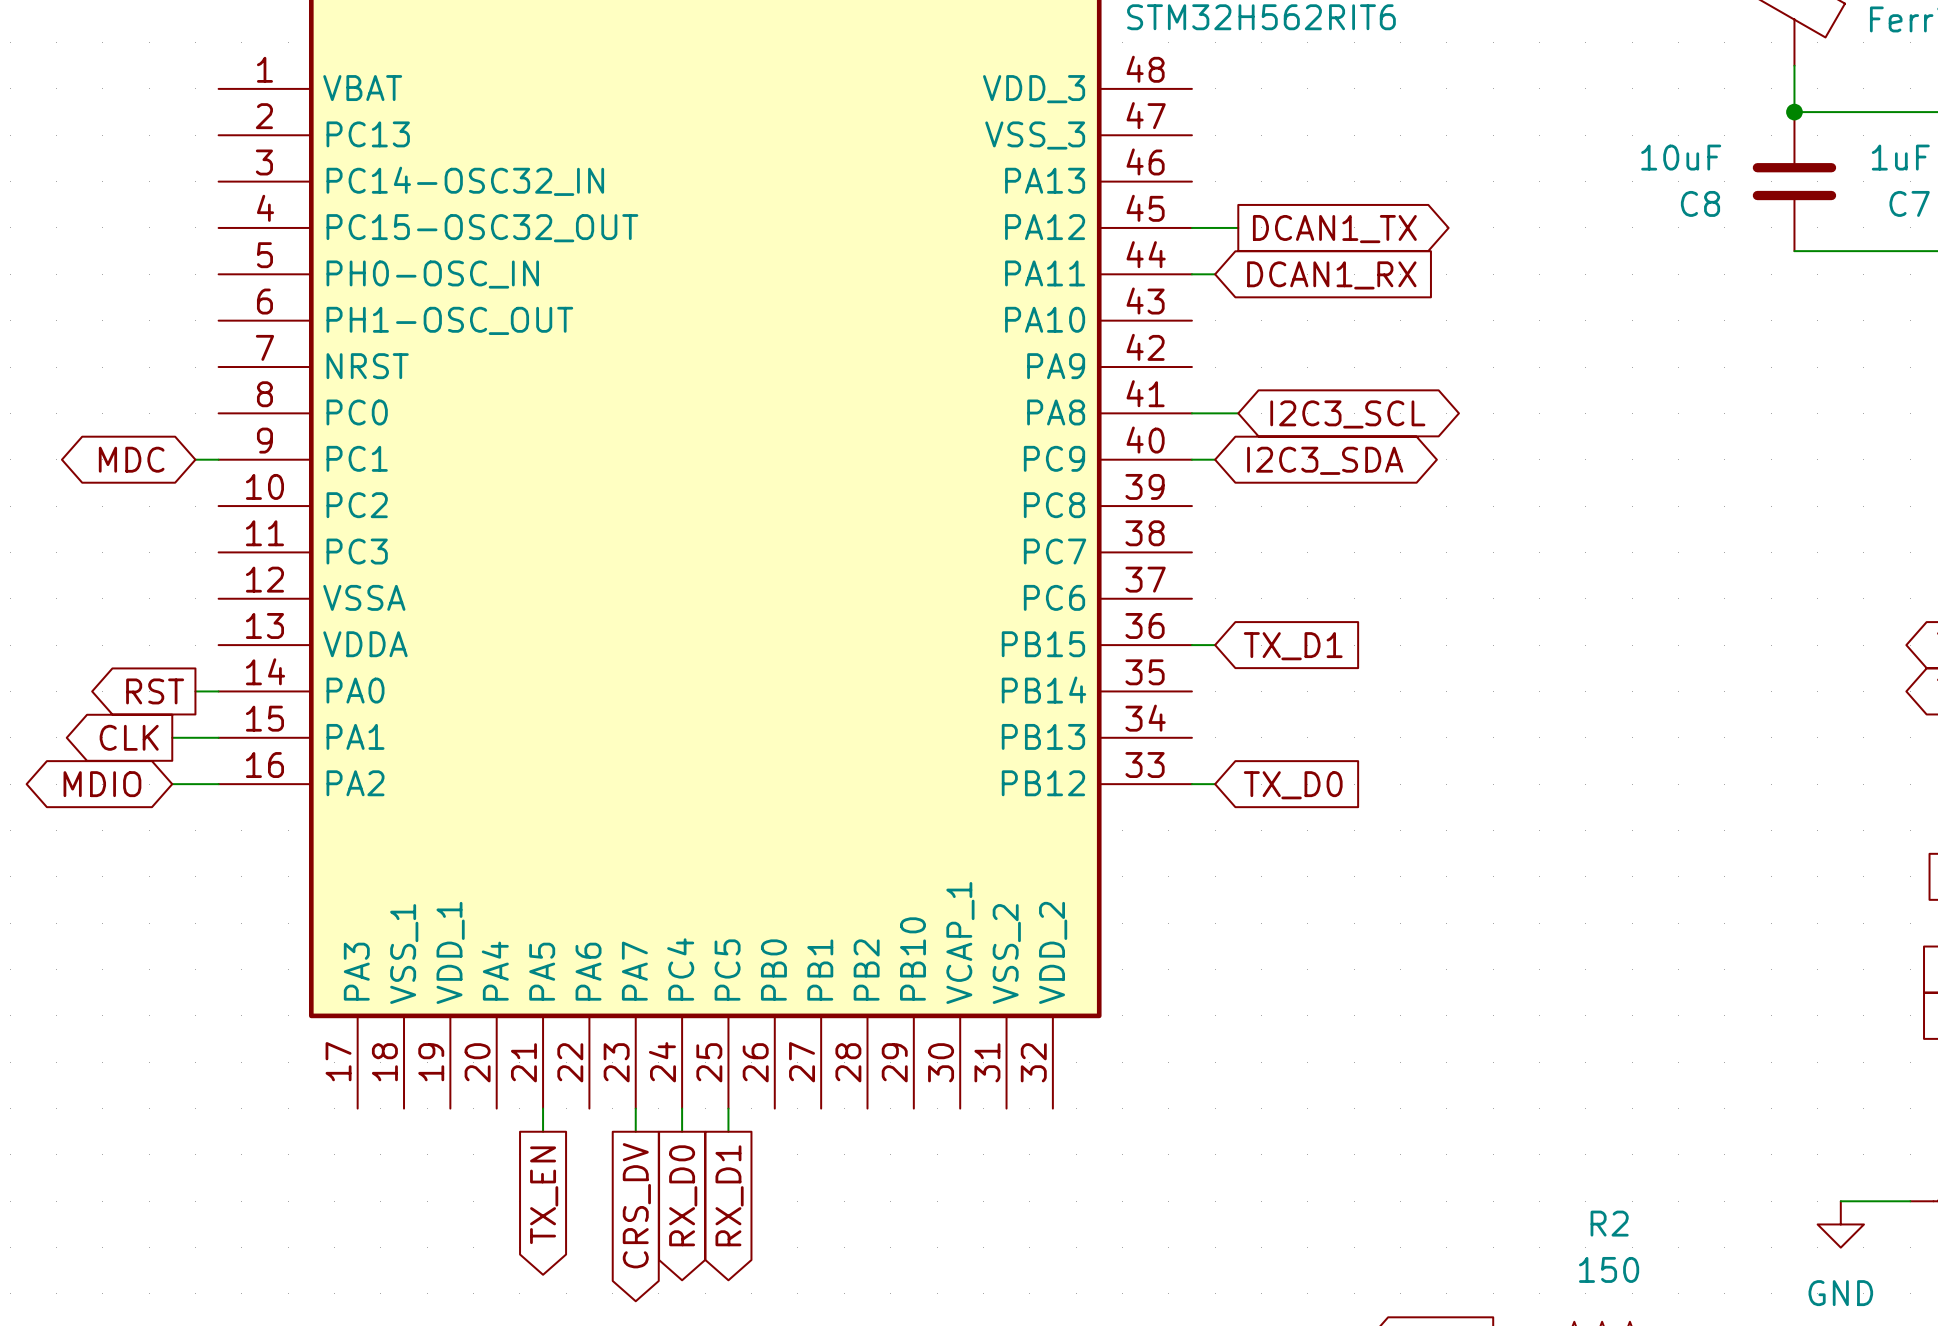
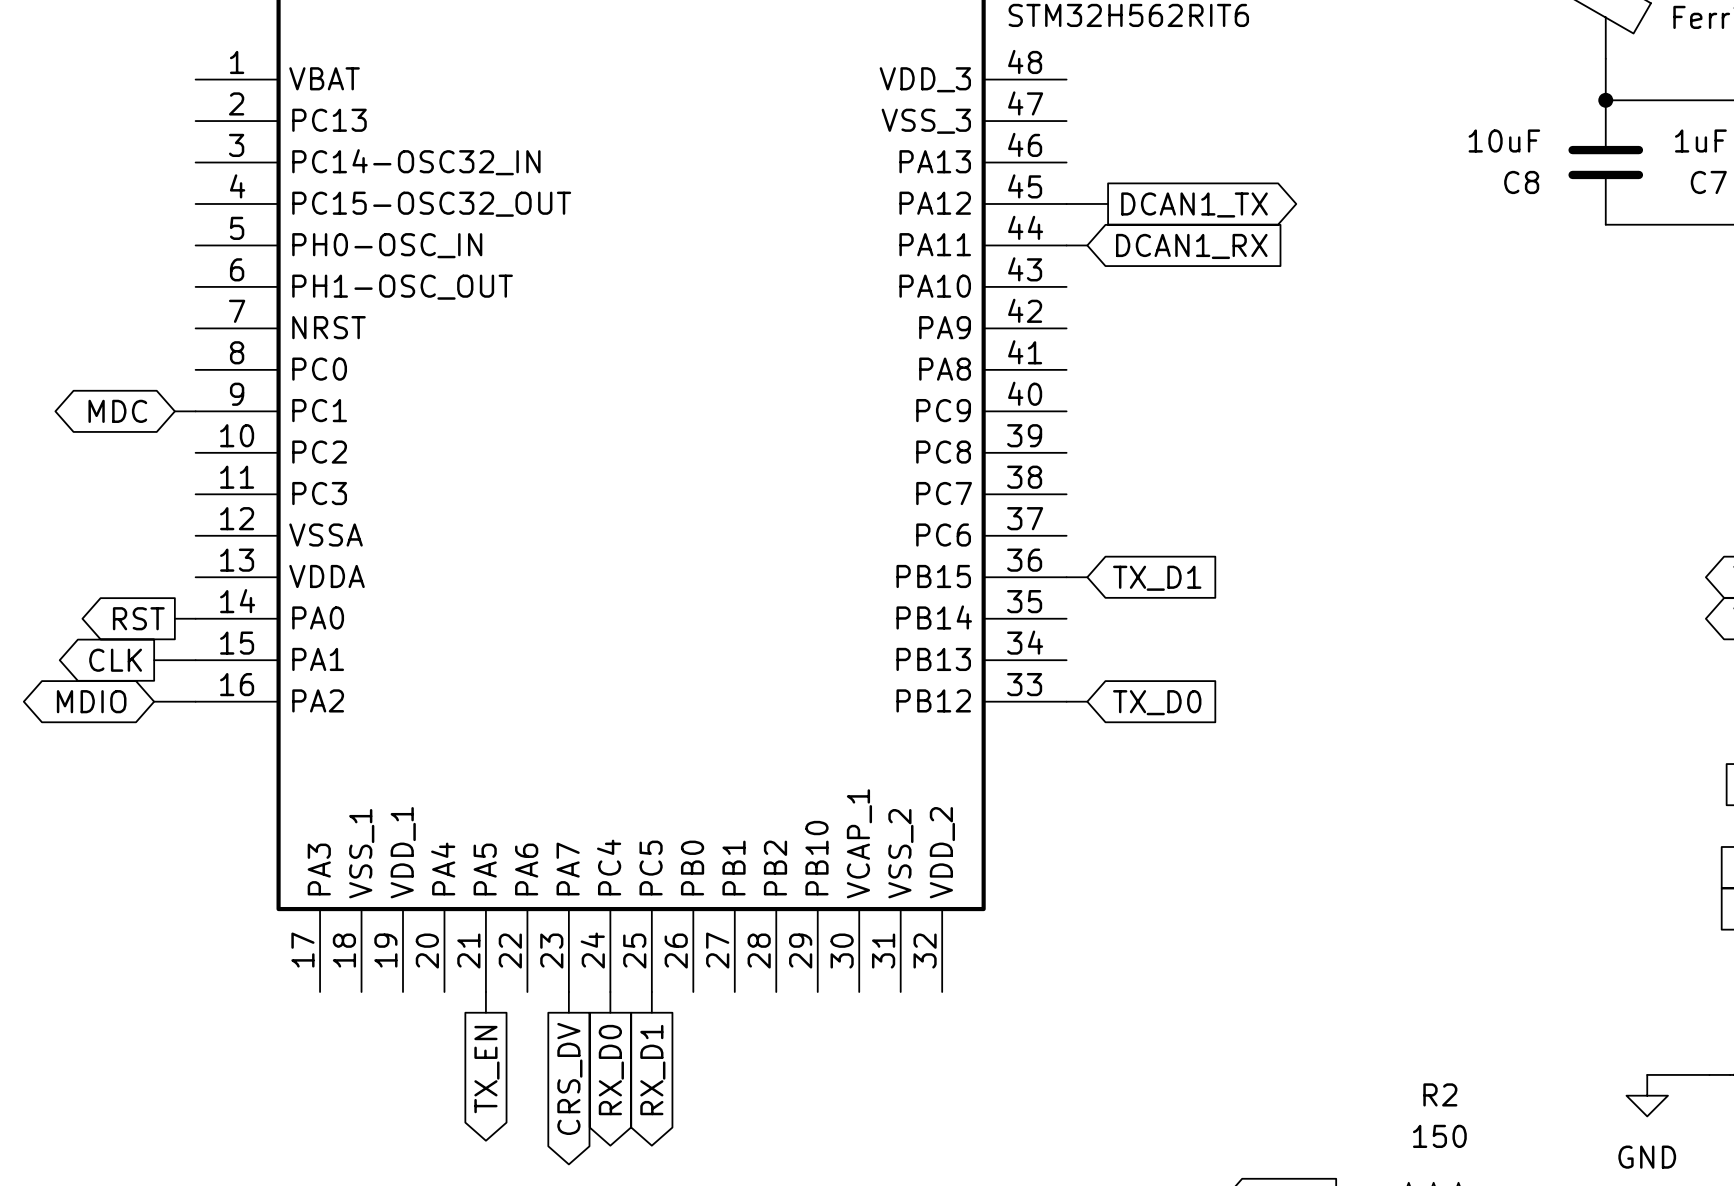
wire: (1191, 413) (1238, 413) -> none
global label: I2C3_SCL (1347, 414) -> none
wire: (1191, 459) (1215, 459) -> none
global label: I2C3_SDA (1325, 460) -> none

